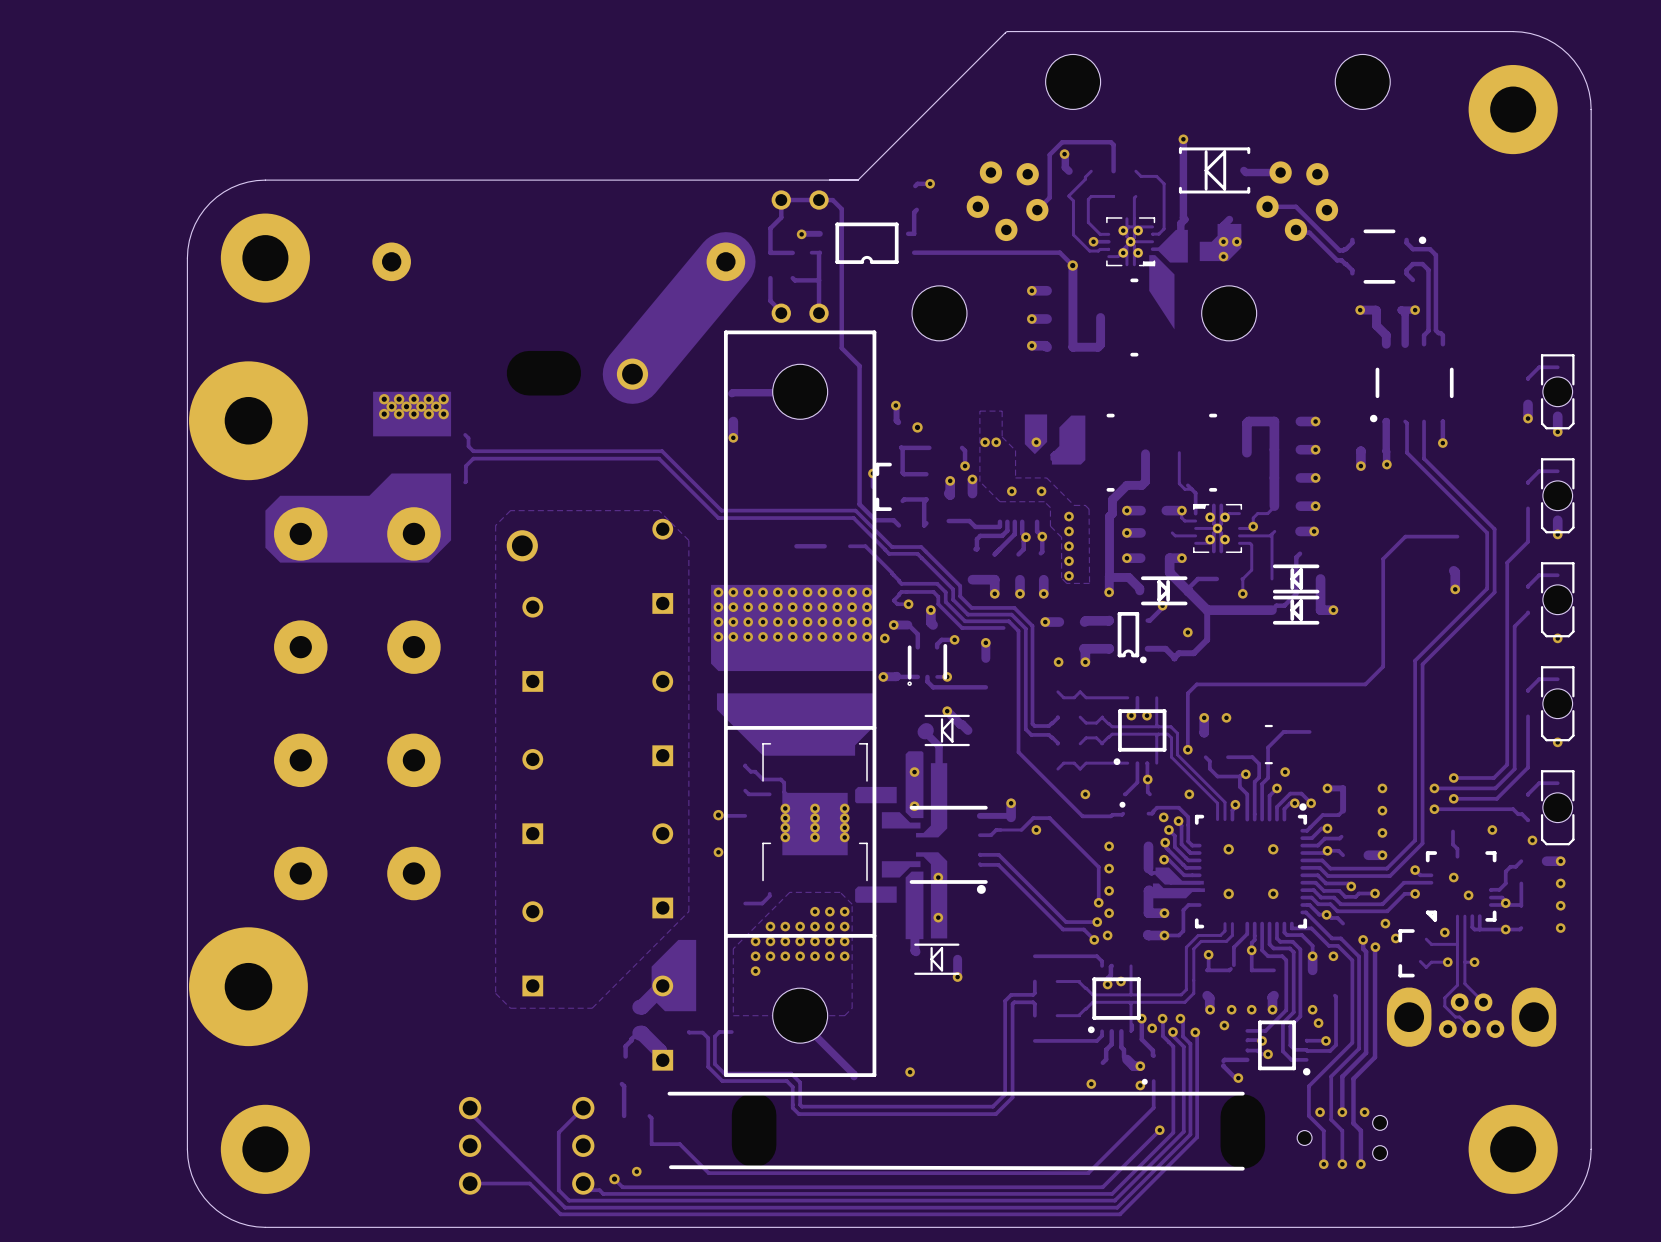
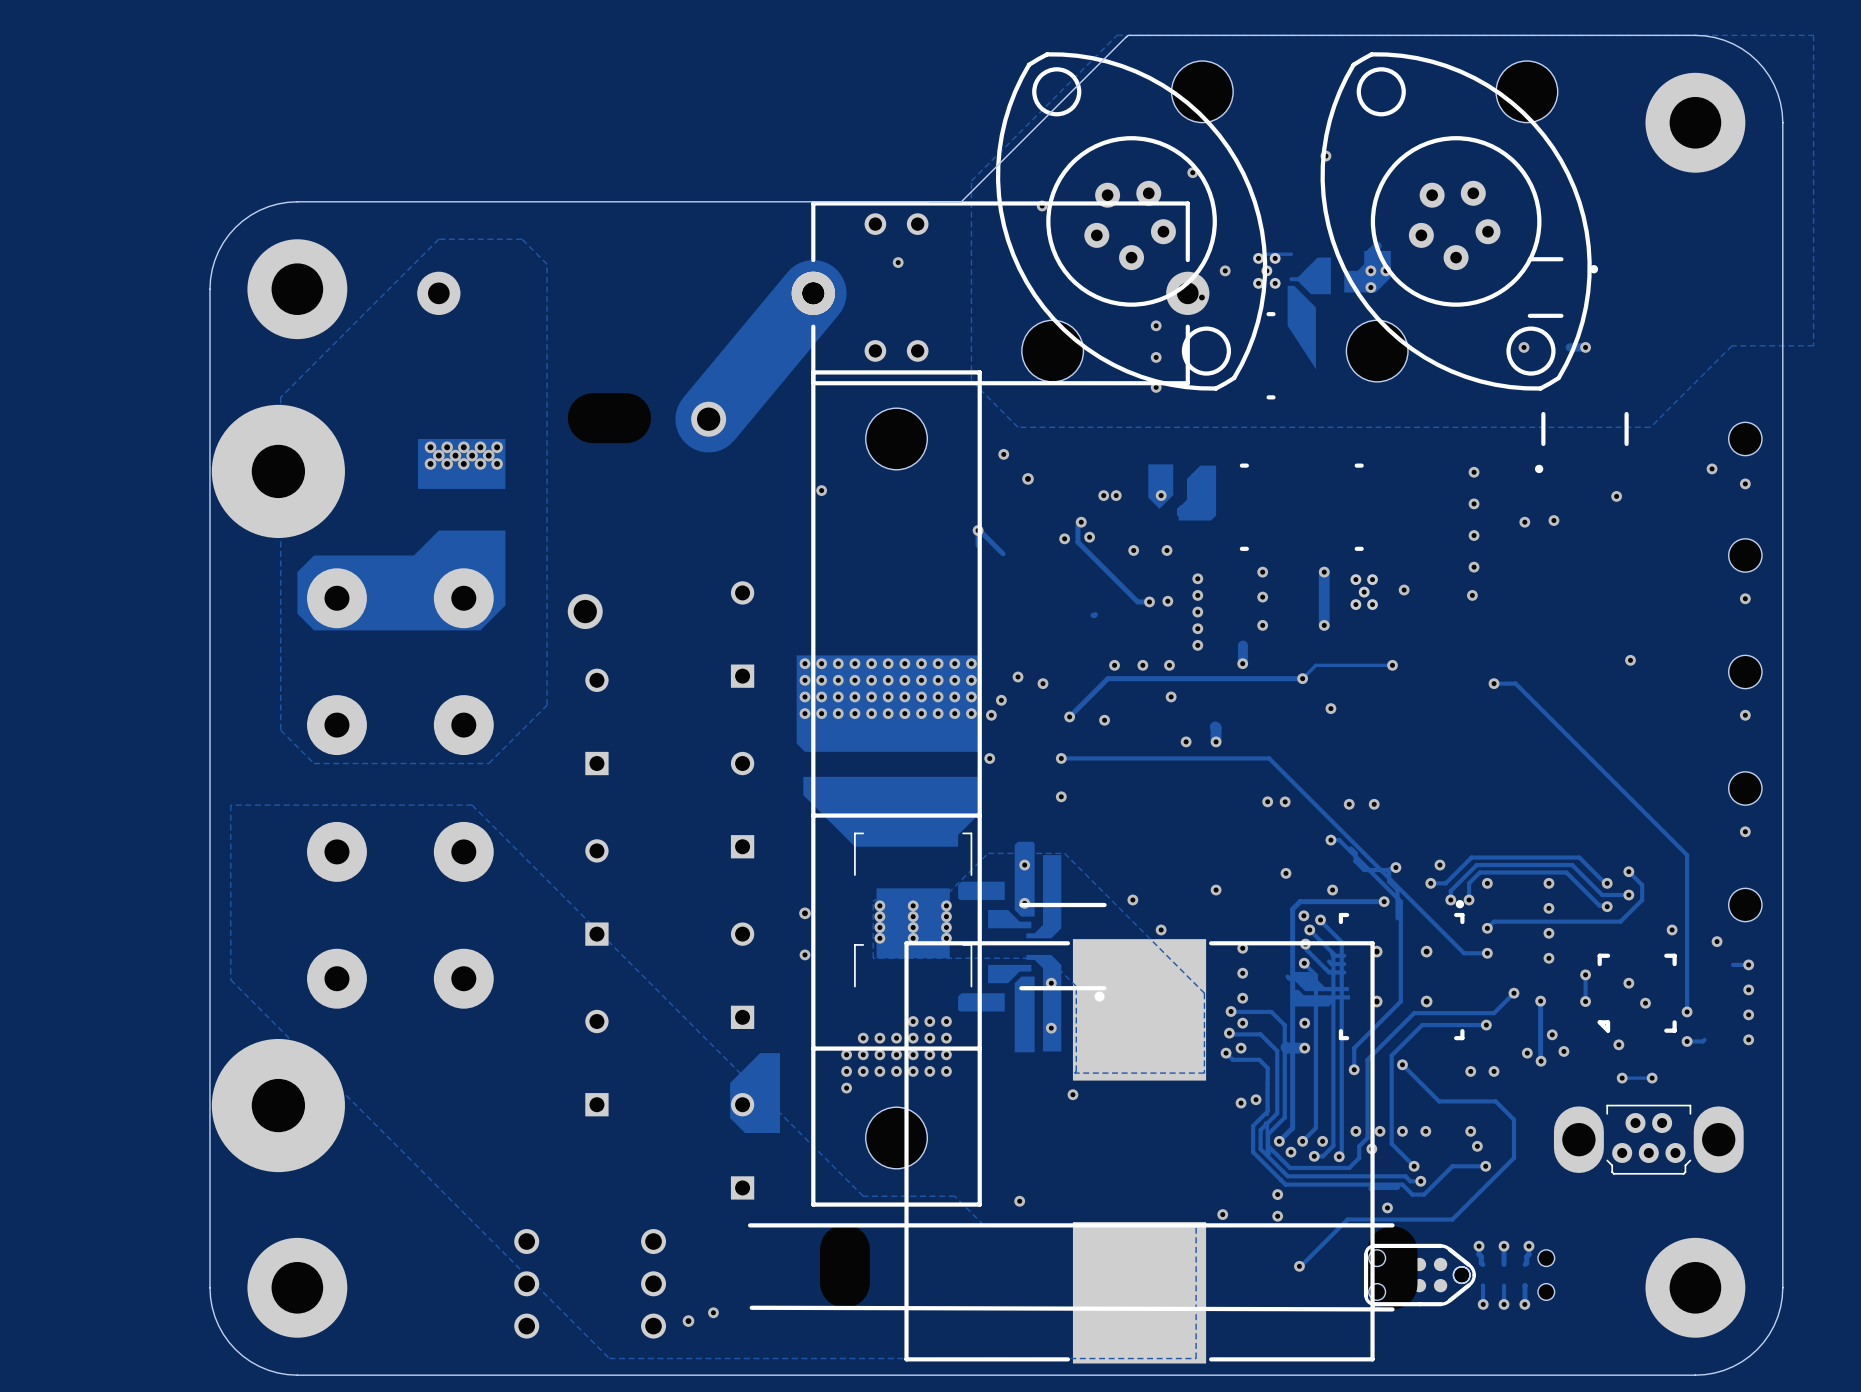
zone outline: none -> (1813, 35) (1117, 35) (971, 181) (971, 380) (1018, 427) (1650, 427) (1732, 345) (1813, 345) (1813, 35)
track: (1183, 139) (1184, 219) (1180, 223) (1180, 252) -> none
track: (1064, 154) (1065, 167) (1069, 171) -> none
part: (1214, 170) -> none
track: (1243, 170) (1245, 172) (1280, 172) -> none
track: (1091, 171) (1069, 195) (1073, 200) (1073, 234) (1089, 251) (1108, 249) -> none
track: (1113, 171) (1113, 144) (1110, 142) (1062, 142) (1049, 154) (1049, 197) (1037, 210) -> none
track: (1135, 171) (1141, 176) (1156, 176) (1164, 183) (1164, 228) (1158, 234) (1152, 234) -> none
track: (930, 183) (917, 183) (915, 186) -> none
track: (1113, 196) (1091, 196) (1088, 199) (1088, 222) (1100, 234) (1108, 234) -> none
track: (1135, 196) (1134, 237) (1130, 241) -> none
track: (819, 200) (781, 200) (781, 217) (770, 228) (770, 252) (792, 252) -> none
track: (819, 200) (832, 200) (841, 209) (841, 348) (859, 365) (859, 504) (875, 520) (893, 520) (898, 525) -> none
part side: top (1007, 201) -> bottom (1131, 221)
part side: top (1297, 201) -> bottom (1456, 221)
track: (1267, 206) (1295, 206) (1339, 250) (1346, 249) (1352, 242) (1352, 239) -> none
track: (916, 209) (914, 212) (914, 233) (908, 233) -> none
zone outline: none -> (522, 239) (547, 264) (547, 705) (488, 763) (314, 763) (280, 730) (280, 397) (438, 239) (522, 239)
track: (1126, 218) (1126, 236) (1134, 245) (1134, 264) -> none
track: (1296, 229) (1298, 232) (1309, 232) (1337, 260) (1341, 260) (1346, 264) (1352, 270) (1352, 273) -> none
track: (819, 233) (801, 234) -> none
track: (1406, 239) (1406, 242) (1412, 249) (1429, 249) (1435, 255) (1435, 330) (1442, 335) (1442, 344) -> none
track: (1108, 241) (1093, 241) -> none
part side: bottom (1130, 241) -> top (1266, 270)
track: (1152, 241) (1130, 241) (1118, 256) (1108, 256) -> none
part: (867, 243) -> none
track: (1126, 246) (1126, 264) -> none
track: (811, 252) (819, 252) (819, 313) -> none
track: (914, 252) (1059, 252) (1072, 265) -> none
part: none -> (1000, 293)
track: (1072, 265) (1072, 347) -> none
track: (770, 278) (770, 300) (781, 313) -> none
track: (792, 278) (794, 280) (819, 280) -> none
track: (1412, 280) (1406, 273) (1406, 270) (1412, 264) (1422, 264) (1428, 269) (1428, 330) (1424, 335) (1424, 344) -> none
track: (1047, 290) (1031, 290) -> none
track: (1360, 310) (1376, 310) (1376, 325) (1386, 335) (1386, 344) -> none
track: (1401, 310) (1405, 313) (1405, 344) -> none
track: (1100, 317) (1100, 344) (1097, 347) (1073, 347) -> none
track: (1047, 319) (1031, 319) -> none
track: (1031, 345) (1047, 347) -> none
track: (1557, 367) (1539, 367) (1528, 379) -> none
track: (800, 391) (731, 393) -> none
part side: bottom (1557, 391) -> top (1745, 438)
track: (1528, 404) (1528, 418) -> none
track: (895, 405) (898, 422) -> none
zone outline: (1002, 411) (1002, 437) (1015, 450) (1015, 477) (1046, 477) (1074, 505) (1085, 505) (1089, 509) (1089, 583) (1066, 583) (1061, 578) (1061, 537) (1050, 526) (1050, 507) (1044, 501) (999, 501) (979, 481) (979, 411) (1002, 411) -> none
track: (1557, 416) (1557, 431) -> none
track: (733, 421) (733, 437) -> none
track: (1315, 421) (1300, 421) -> none
track: (1386, 421) (1386, 464) -> none
track: (1405, 421) (1407, 423) (1407, 452) (1487, 532) (1487, 588) (1415, 660) (1415, 840) (1386, 868) (1330, 868) (1322, 860) (1302, 860) -> none
track: (1424, 421) (1424, 458) (1494, 529) (1494, 592) (1422, 664) (1422, 843) (1389, 876) (1328, 876) (1319, 867) (1302, 867) -> none
track: (1442, 421) (1442, 443) -> none
track: (465, 434) (468, 438) (468, 446) (473, 451) (662, 451) (721, 510) (855, 510) (892, 547) (921, 547) (960, 586) (960, 596) (971, 607) (1014, 607) (1032, 626) (1032, 723) (1034, 726) (1048, 726) (1057, 717) -> none
track: (901, 447) (902, 472) (926, 474) -> none
track: (929, 447) (901, 447) -> none
track: (962, 447) (965, 450) (965, 466) -> none
track: (1315, 449) (1300, 449) -> none
track: (1360, 451) (1360, 466) -> none
track: (1179, 452) (1179, 483) (1184, 489) (1191, 489) -> none
track: (1246, 452) (1246, 423) (1248, 421) (1274, 421) (1274, 506) (1267, 513) (1257, 513) (1253, 518) (1251, 528) (1239, 528) -> none
track: (1145, 453) (1145, 481) (1141, 485) (1126, 485) (1112, 499) (1112, 513) (1109, 516) (1109, 575) (1128, 577) (1139, 590) -> none
track: none -> (1077, 522) (1077, 542) (1137, 601) (1149, 601)
track: (1557, 471) (1539, 471) (1528, 483) -> none
track: none -> (979, 530) (1003, 553)
track: (1315, 477) (1300, 477) -> none
track: (972, 479) (972, 493) -> none
track: (950, 480) (950, 495) (948, 493) -> none
track: (465, 482) (465, 466) (473, 458) (659, 458) (718, 518) (853, 518) (885, 549) -> none
track: (1187, 485) (1195, 493) (1195, 513) -> none
part: (883, 486) -> none
part side: bottom (1557, 495) -> top (1745, 555)
track: (902, 500) (926, 499) (924, 501) (924, 525) (926, 523) -> none
track: (1213, 505) (1213, 523) (1217, 527) -> none
track: (1221, 505) (1221, 523) (1217, 527) -> none
track: (1315, 506) (1300, 506) -> none
track: (1528, 508) (1528, 541) (1507, 562) (1507, 764) (1493, 778) (1453, 778) -> none
zone outline: (659, 510) (510, 510) (495, 525) (495, 993) (510, 1008) (592, 1008) (688, 911) (688, 540) (659, 510) -> none
track: (1141, 510) (1126, 510) -> none
track: (1181, 510) (1166, 510) -> (1324, 572) (1324, 625)
track: (1179, 511) (1184, 521) (1195, 521) -> none
track: (1239, 513) (1229, 513) (1224, 517) -> none
track: (1557, 520) (1557, 534) -> none
track: (948, 521) (969, 521) (975, 526) (999, 526) (999, 521) -> none
track: (1007, 521) (1007, 530) (1002, 535) (980, 535) (976, 539) (976, 549) -> none
track: (1014, 521) (1014, 534) (994, 554) -> none
track: (1022, 521) (1022, 533) (1025, 538) (1023, 541) (1023, 549) (1018, 554) -> none
track: (1037, 521) (1037, 531) (1042, 536) (1040, 553) -> none
track: (1217, 528) (1195, 528) -> none
part side: bottom (1217, 528) -> top (1364, 592)
track: (1217, 529) (1221, 533) (1221, 551) -> none
track: (1217, 529) (1213, 533) (1213, 551) -> none
track: (1274, 531) (1272, 534) -> none
track: (1314, 531) (1300, 531) -> none
track: (1141, 532) (1126, 532) -> none
track: (1172, 532) (1175, 535) (1195, 535) -> none
track: (1272, 534) (1272, 578) -> none
track: (1272, 534) (1270, 535) (1239, 535) -> none
track: (1457, 536) (1405, 536) (1383, 558) (1383, 666) (1365, 684) (1196, 684) (1187, 693) (1187, 749) -> (1354, 1069) (1354, 1048) (1400, 1001) (1400, 901) (1339, 840) (1330, 840)
track: (1208, 543) (1195, 543) -> none
track: (1239, 543) (1251, 545) (1251, 570) (1242, 578) (1242, 593) -> (1069, 716) (1107, 678) (1302, 678) (1315, 665) (1392, 665)
track: (824, 546) (796, 546) -> none
track: (849, 546) (865, 546) (901, 583) (937, 583) (945, 592) (945, 601) (965, 621) (1008, 621) (1018, 630) (1018, 752) (1082, 816) (1110, 816) (1123, 813) -> none
track: (885, 549) (889, 553) (917, 553) (953, 589) (953, 599) (968, 614) (1011, 614) (1025, 628) (1025, 729) (1031, 734) (1048, 734) (1057, 743) -> none
track: (1300, 553) (1296, 557) (1296, 593) (1284, 605) (1276, 605) (1272, 610) (1207, 610) -> none
track: (1140, 558) (1126, 558) -> none
track: (1181, 558) (1169, 558) (1169, 572) (1207, 610) -> none
track: (1453, 570) (1455, 589) -> none
track: (1557, 575) (1539, 575) (1528, 587) -> none
track: (1216, 578) (1197, 578) (1188, 588) (1188, 591) -> none
part: (1296, 578) -> none
track: (1320, 578) (1320, 610) (1333, 610) -> none
track: (972, 579) (994, 579) (994, 593) -> none
track: (1020, 579) (1020, 593) -> none
track: (1043, 579) (1043, 593) -> none
part: (1164, 590) -> none
part side: bottom (1557, 599) -> top (1745, 671)
track: (908, 604) (897, 604) (893, 600) (901, 591) (933, 591) (938, 596) (938, 604) (962, 627) (1003, 627) -> none
track: (1162, 605) (1149, 620) (1147, 620) -> none
track: (930, 610) (930, 622) (933, 625) -> none
track: (1207, 610) (1207, 639) (1193, 653) (1178, 653) (1174, 657) -> none
part: (1296, 610) -> none
track: (1528, 612) (1514, 626) (1514, 769) (1495, 788) (1434, 788) -> none
track: (1109, 620) (1084, 622) -> none
track: (1059, 622) (1045, 622) -> none
track: (893, 625) (908, 625) (917, 634) (917, 647) -> none
part: (1132, 637) -> none
track: (954, 639) (941, 639) (937, 644) (937, 647) -> none
track: (985, 642) (985, 658) -> none
track: (1109, 648) (1083, 648) -> none
track: (1147, 648) (1165, 648) (1174, 657) -> none
part: (927, 664) -> none
track: (896, 676) (883, 676) -> none
track: (898, 676) (917, 676) -> none
track: (927, 676) (927, 681) (933, 687) (985, 687) -> none
track: (947, 676) (937, 676) -> none
track: (1557, 679) (1539, 679) (1528, 691) -> none
track: (1057, 691) (1063, 697) (1074, 697) (1080, 691) (1086, 697) (1127, 697) -> none
track: (1137, 697) (1137, 709) (1131, 715) -> none
track: (1156, 697) (1156, 725) (1158, 726) -> none
part side: bottom (1557, 703) -> top (1745, 788)
track: (947, 711) (968, 730) -> none
track: (1528, 716) (1528, 767) (1496, 798) (1453, 798) -> none
track: (1080, 717) (1086, 723) (1096, 723) (1102, 717) (1112, 726) (1170, 726) (1177, 733) (1177, 754) (1224, 802) (1224, 819) -> none
track: (1204, 717) (1204, 732) -> none
zone outline: none -> (472, 805) (863, 1196) (954, 1196) (983, 1225) (1196, 1225) (1196, 1358) (609, 1358) (230, 979) (230, 805) (472, 805)
track: (926, 730) (924, 731) -> none
part: (947, 730) -> none
track: (1309, 731) (1283, 731) (1268, 747) (1268, 778) (1262, 783) (1262, 819) -> none
track: (926, 733) (939, 746) (939, 763) -> none
track: (1158, 734) (1156, 735) (1156, 763) -> none
part: (1140, 737) -> none
track: (1101, 743) (1112, 734) (1167, 734) (1171, 737) (1171, 757) (1217, 803) (1217, 819) -> none
track: (1102, 743) (1096, 737) (1086, 737) (1080, 743) -> none
part: (1268, 744) -> none
track: (1227, 757) (1252, 757) (1259, 763) (1259, 777) (1254, 781) (1254, 819) -> none
zone outline: none -> (1064, 853) (988, 853) (941, 900) (874, 900) (873, 901) (873, 958) (1047, 958) (1076, 986) (1076, 1071) (1074, 1073) (1204, 1073) (1204, 993) (1064, 853)
track: (1127, 763) (1086, 763) (1080, 769) (1074, 763) (1063, 763) (1057, 769) -> none
track: (1137, 763) (1137, 782) (1124, 794) -> none
track: (1147, 763) (1147, 792) (1149, 794) -> none
track: (745, 765) (763, 779) (780, 779) (784, 782) (784, 792) (788, 796) (815, 796) -> none
track: (1557, 783) (1539, 783) (1528, 795) -> none
track: (1276, 788) (1269, 795) (1269, 819) -> (1430, 883) (1445, 883) (1471, 857) (1579, 857) (1607, 883)
track: (1327, 788) (1343, 788) (1343, 810) (1338, 815) (1322, 815) (1307, 830) (1302, 830) -> none
track: (745, 790) (748, 794) (769, 794) -> none
track: (1011, 803) (1011, 817) (979, 815) -> none
track: (1294, 803) (1290, 803) (1284, 808) (1284, 819) -> (1450, 900) (1450, 891) (1476, 865) (1572, 865) (1602, 895) (1628, 895)
track: (1311, 803) (1301, 793) (1290, 793) (1276, 806) (1276, 819) -> (1469, 900) (1469, 883) (1479, 872) (1566, 872) (1599, 905) (1607, 906)
part: (1122, 804) -> none
track: (1235, 804) (1232, 810) (1232, 819) -> (1384, 901) (1300, 901) (1292, 909) (1292, 1128) (1279, 1141)
part side: bottom (1557, 807) -> top (1745, 905)
track: (1434, 809) (1513, 809) (1528, 820) -> none
track: (1148, 813) (1152, 813) (1157, 807) (1178, 807) (1188, 817) (1188, 841) (1192, 845) (1199, 845) -> none
track: (745, 815) (716, 815) -> none
track: (1178, 821) (1181, 825) (1181, 844) (1188, 851) -> (1320, 920) (1341, 942) (1341, 1154) (1339, 1156)
track: (1327, 828) (1321, 828) (1311, 838) (1302, 838) -> (1487, 928) (1494, 921) (1620, 921) (1642, 900) (1642, 885) (1628, 871)
track: (1453, 831) (1453, 844) (1457, 848) (1457, 856) -> none
track: (979, 835) (991, 835) (996, 829) (1021, 829) (1033, 818) (1049, 818) (1098, 867) (1098, 902) -> none
track: (1174, 835) (1174, 847) (1186, 858) -> (1316, 936) (1333, 953) (1333, 1145) (1322, 1156) (1314, 1156)
track: (1341, 836) (1339, 838) (1324, 838) (1317, 845) (1302, 845) -> none
track: (1148, 846) (1148, 868) -> none
track: (1325, 850) (1323, 853) (1302, 853) -> (1485, 953) (1464, 953) (1269, 758) (1061, 758)
track: (1327, 850) (1338, 850) (1343, 855) -> none
track: (979, 854) (998, 854) (1066, 922) (1097, 922) -> none
track: (1382, 855) (1368, 855) -> none
track: (1164, 859) (1168, 859) (1184, 875) (1199, 875) -> (1304, 963) (1315, 975) (1315, 1128) (1302, 1141)
track: (1521, 861) (1515, 866) (1510, 866) (1505, 871) -> (1494, 683) (1515, 683) (1687, 855) (1687, 976)
track width: thick (1560, 861) (1546, 861) -> thin (1748, 964) (1732, 964)
track: (979, 864) (998, 864) (1063, 929) (1083, 929) (1094, 939) -> none
track: (1415, 870) (1420, 875) (1431, 875) -> (1585, 974) (1585, 1001)
track: (1302, 875) (1317, 875) (1326, 883) (1348, 883) (1351, 886) -> (1490, 1013) (1494, 1013) (1514, 993)
track: (1302, 882) (1315, 882) (1323, 890) (1339, 890) (1345, 896) (1355, 896) (1359, 893) (1375, 893) -> (1541, 1061) (1540, 1001)
track: (1431, 882) (1403, 882) (1382, 904) (1340, 904) (1334, 897) (1321, 897) (1313, 890) (1302, 890) -> none
track: (1505, 883) (1499, 889) (1490, 890) -> (1687, 989) (1687, 1009)
track: (1521, 883) (1521, 905) (1490, 905) -> none
track: (1199, 890) (1149, 890) (1148, 913) (1164, 913) -> none
zone outline: (840, 892) (852, 904) (852, 1008) (844, 1015) (733, 1015) (733, 948) (789, 892) (840, 892) -> none
track: (769, 893) (762, 903) (745, 903) -> none
track: (1415, 893) (1404, 893) (1387, 911) (1337, 911) (1330, 904) -> none
track: (1302, 897) (1311, 897) (1318, 904) -> (1231, 1011) (1271, 1011) (1284, 1025) (1284, 1117) (1268, 1134) (1268, 1145) (1290, 1167) (1349, 1167) (1359, 1157) (1359, 1146) (1367, 1138) (1367, 1059) (1414, 1013) (1477, 1013)
track: (1490, 897) (1502, 897) (1505, 901) -> none
track: (1199, 905) (1188, 905) (1183, 910) (1183, 931) (1178, 935) (1164, 935) -> none
track: (1302, 905) (1309, 905) (1319, 914) (1337, 918) (1343, 923) -> none
track: (1302, 912) (1305, 912) (1331, 938) (1340, 938) (1359, 956) (1359, 1048) (1331, 1076) (1331, 1119) (1342, 1130) (1342, 1147) -> none
track: (1457, 916) (1457, 985) (1444, 997) (1444, 1006) (1471, 1029) -> none
track: (1464, 916) (1464, 983) (1483, 1002) -> none
track: (1472, 916) (1472, 927) (1474, 929) (1505, 929) -> none
track: (1479, 916) (1479, 929) -> none
track: (1224, 923) (1224, 931) (1220, 935) (1198, 935) (1186, 947) (1186, 989) (1181, 994) (1092, 994) (1079, 981) (1057, 981) -> none
track: (1232, 923) (1232, 935) (1226, 941) (1201, 941) (1193, 948) (1193, 993) (1184, 1002) (1092, 1002) (1079, 1015) (1057, 1015) -> none
track: (1247, 923) (1247, 933) (1233, 947) (1233, 965) -> none
track: (1254, 923) (1254, 939) (1251, 942) (1251, 970) (1274, 970) -> none
track: (1262, 923) (1262, 950) (1268, 956) (1282, 956) (1286, 960) (1286, 1010) (1265, 1030) (1247, 1030) -> none
track: (1269, 923) (1269, 944) (1273, 948) (1289, 948) (1293, 952) (1293, 1012) (1282, 1023) (1282, 1051) (1291, 1059) (1306, 1059) -> none
track: (1276, 923) (1276, 938) (1280, 941) (1292, 941) (1300, 949) (1300, 1016) (1290, 1026) (1290, 1045) (1294, 1049) (1330, 1050) (1336, 1045) (1334, 995) -> none
track: (1284, 923) (1284, 932) (1287, 935) (1301, 935) (1312, 945) (1312, 970) -> none
track: (1291, 923) (1291, 928) (1311, 928) (1328, 945) (1337, 945) (1352, 960) (1352, 1042) (1308, 1086) (1308, 1115) (1323, 1130) (1323, 1164) -> (1483, 1285) (1483, 1304)
track: (913, 926) (916, 951) -> none
track: (1363, 939) (1363, 948) (1366, 951) (1366, 1052) (1342, 1076) (1342, 1112) -> (1504, 1264) (1504, 1246)
track: (1426, 939) (1431, 944) (1457, 944) -> none
track: (1375, 947) (1375, 1057) (1353, 1078) (1353, 1123) (1360, 1130) (1360, 1164) -> (1524, 1285) (1524, 1304)
part: (1406, 953) -> none
track: (1210, 954) (1208, 954) (1207, 970) (1230, 968) -> none
track: (1034, 956) (1096, 956) (1102, 961) (1102, 965) -> none
part: (936, 959) -> none
track: (957, 959) (957, 977) -> none
track: (1420, 961) (1426, 967) (1431, 962) (1447, 962) -> (1641, 1078) (1622, 1078)
track: (1111, 965) (1107, 984) -> none
track: (1034, 981) (1034, 993) (1033, 994) (1011, 994) (1005, 1000) (1005, 1094) (992, 1106) (801, 1106) (800, 1104) (800, 1082) (791, 1073) (724, 1073) (714, 1064) (714, 1036) (719, 1032) (731, 1032) -> none
track: (662, 985) (641, 1007) (639, 1007) -> none
track: (1207, 995) (1209, 998) (1210, 1009) -> none
track: (1274, 995) (1272, 997) (1272, 1009) -> none
part: (1114, 1005) -> none
track: (800, 1015) (800, 1020) (854, 1074) (854, 1076) -> none
track: (1034, 1015) (1034, 1004) (1033, 1002) (1014, 1002) (1012, 1004) (1012, 1097) (995, 1114) (798, 1114) (792, 1107) (792, 1086) (786, 1081) (722, 1081) (708, 1066) (708, 1038) (702, 1032) (688, 1032) -> none
part side: top (1471, 1017) -> bottom (1648, 1139)
track: (1141, 1018) (1141, 1039) (1152, 1050) (1153, 1055) -> none
track: (1162, 1018) (1162, 1036) (1173, 1046) (1173, 1132) (1112, 1193) (603, 1193) (599, 1190) (588, 1190) -> none
track: (1180, 1018) (1183, 1021) (1183, 1036) (1190, 1043) (1190, 1134) (1117, 1207) (565, 1207) (467, 1110) -> none
part: none -> (1139, 1151)
track: (1102, 1031) (1102, 1035) (1096, 1040) (1034, 1040) -> none
track: (1111, 1031) (1111, 1044) (1106, 1049) (1106, 1059) (1102, 1062) -> none
track: (1121, 1031) (1121, 1047) (1123, 1049) (1123, 1057) -> none
track: (1173, 1032) (1173, 1035) (1183, 1046) (1183, 1131) (1114, 1200) (569, 1200) (558, 1190) (558, 1132) (583, 1108) -> none
track: (1195, 1032) (1197, 1035) (1197, 1137) (1120, 1214) (560, 1214) (529, 1183) (470, 1183) -> none
track: (639, 1033) (659, 1050) (659, 1057) (662, 1060) -> none
track: (633, 1037) (625, 1046) (625, 1056) -> none
track: (1261, 1040) (1247, 1040) -> (1413, 1165) (1391, 1143) (1391, 1055) (1422, 1025) (1486, 1025)
track: (1325, 1040) (1306, 1040) -> (1485, 1166) (1452, 1166) (1424, 1194) (1412, 1194) (1402, 1184) (1285, 1184) (1253, 1152) (1253, 1125) (1267, 1111) (1267, 1068) (1259, 1059) (1232, 1059) (1226, 1053)
part: (1284, 1047) -> none
track: (1247, 1050) (1257, 1050) (1261, 1054) -> (1229, 1033) (1260, 1034) (1277, 1051) (1277, 1113) (1260, 1130) (1260, 1149) (1287, 1176) (1405, 1176) (1410, 1181) (1413, 1181)
track: (1126, 1059) (1133, 1066) (1140, 1066) -> none
track: (1223, 1065) (1235, 1078) (1238, 1078) -> none
part: (1144, 1081) -> none
track: (1153, 1081) (1153, 1107) (1088, 1173) (708, 1173) (679, 1144) (651, 1144) (651, 1118) (649, 1115) -> none
track: (621, 1084) (624, 1086) (624, 1115) -> none
track: none -> (1479, 1246) (1479, 1254) (1482, 1264)
track: none -> (1528, 1246) (1528, 1254) (1525, 1264)
track: (1159, 1130) (1102, 1187) (622, 1187) (614, 1179) -> (1299, 1266) (1347, 1219) (1452, 1219) (1514, 1157) (1514, 1119) (1495, 1101) (1439, 1101) (1402, 1064)
part: none -> (1419, 1275)

